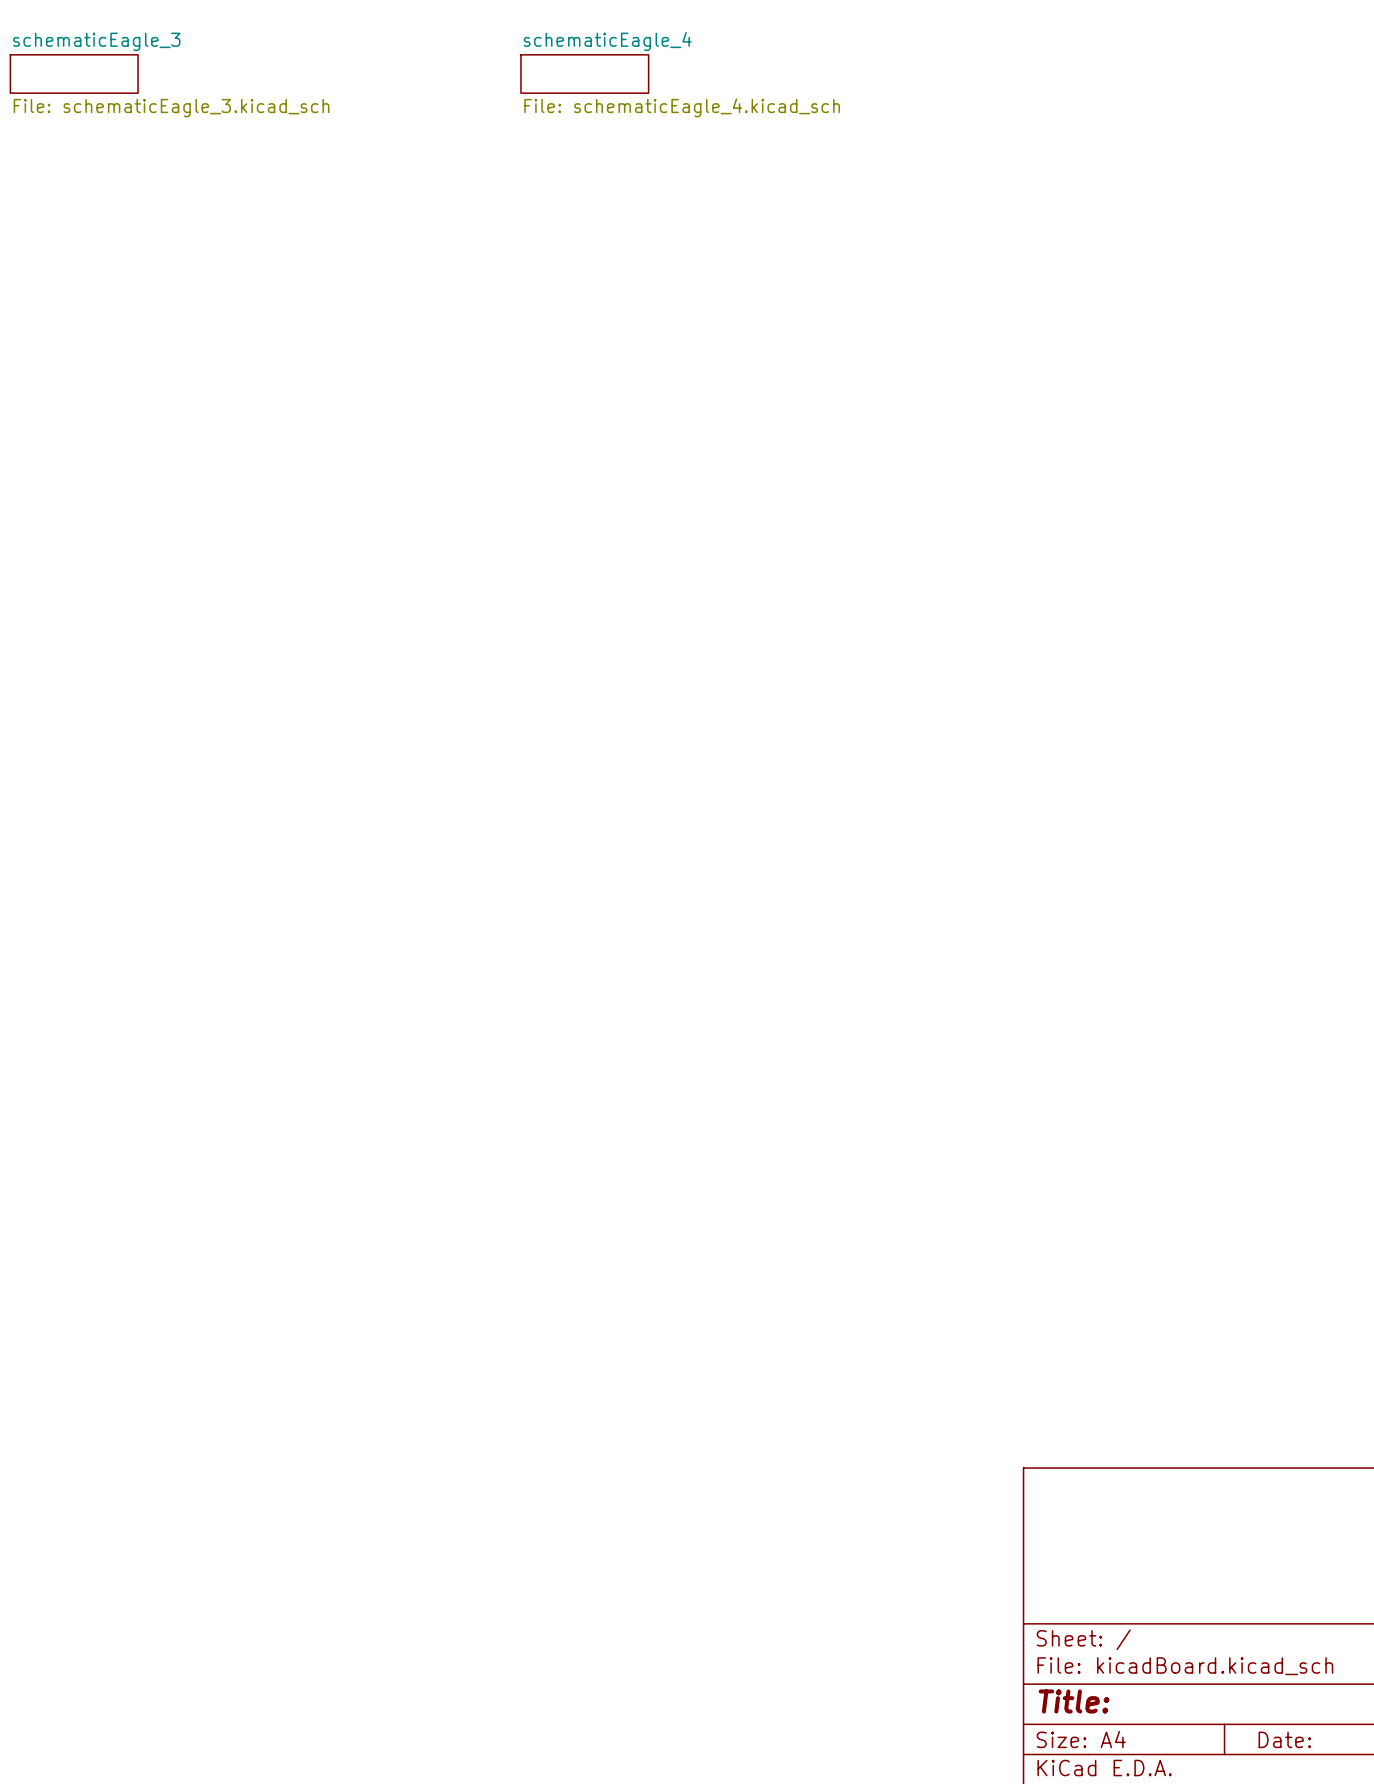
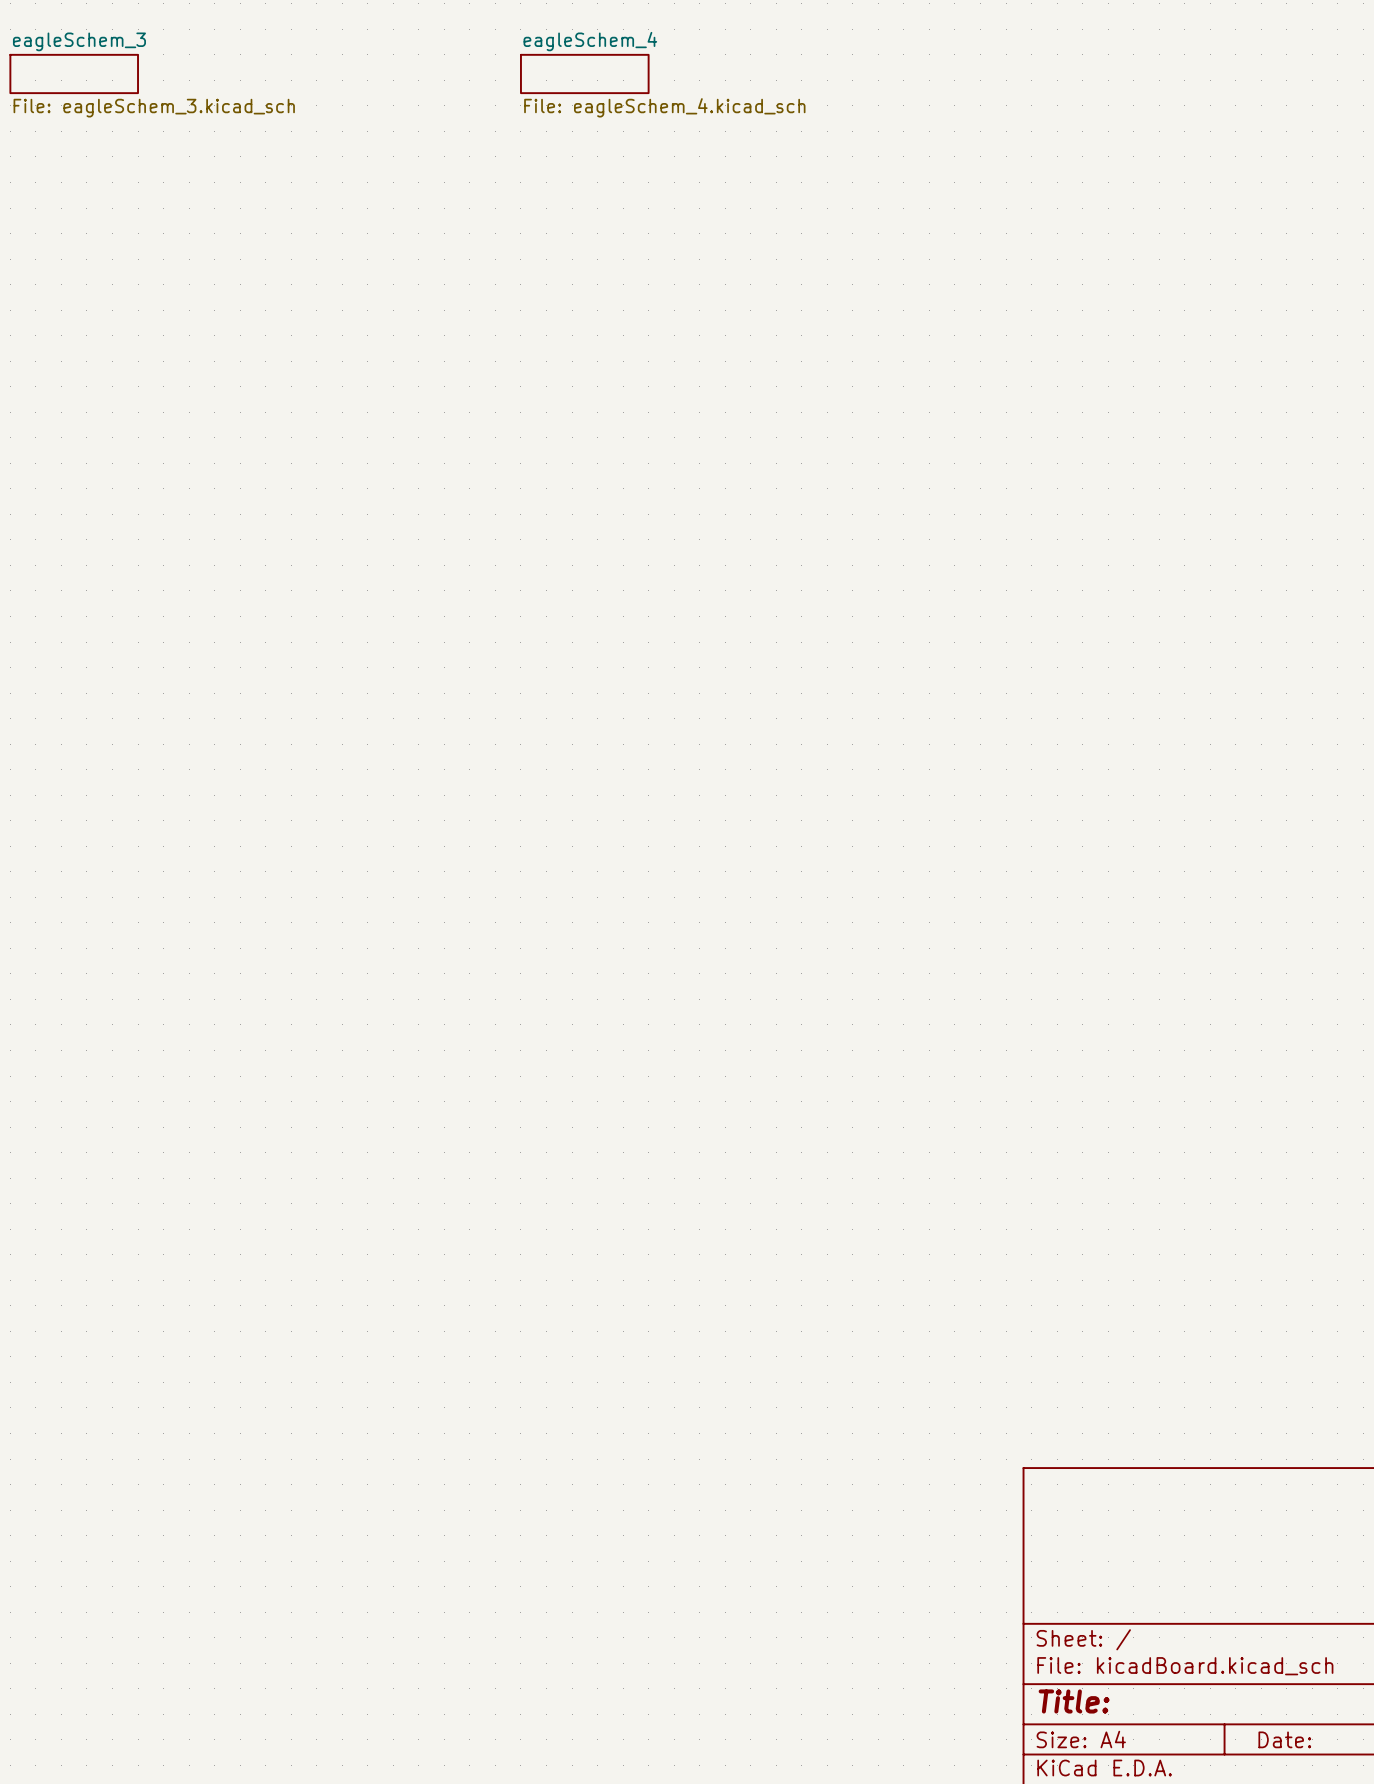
sheet schematicEagle_3 name: schematicEagle_3 (96, 41) -> eagleSchem_3 (79, 41)
sheet schematicEagle_4 name: schematicEagle_4 (607, 41) -> eagleSchem_4 (590, 41)
sheet schematicEagle_4 value: File: schematicEagle_4.kicad_sch (682, 107) -> File: eagleSchem_4.kicad_sch (664, 107)
sheet schematicEagle_3 value: File: schematicEagle_3.kicad_sch (171, 108) -> File: eagleSchem_3.kicad_sch (154, 108)

